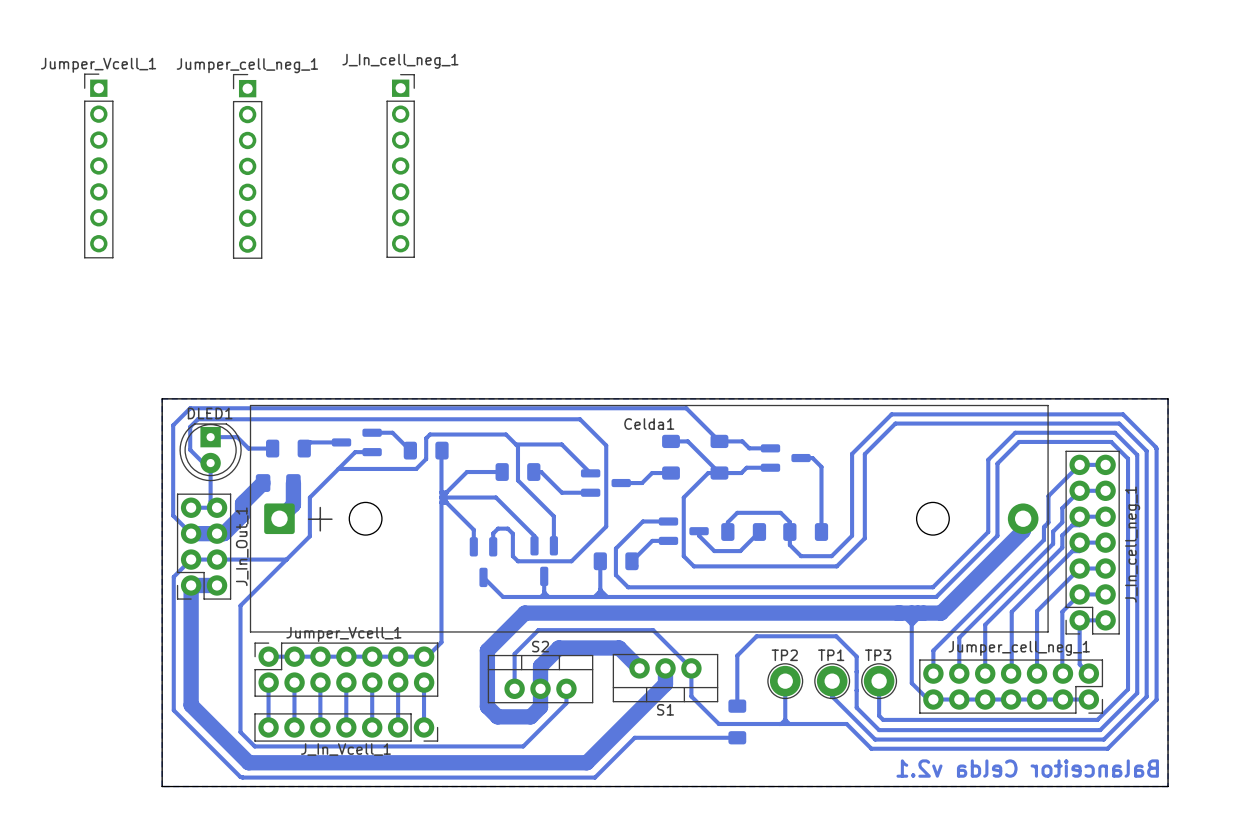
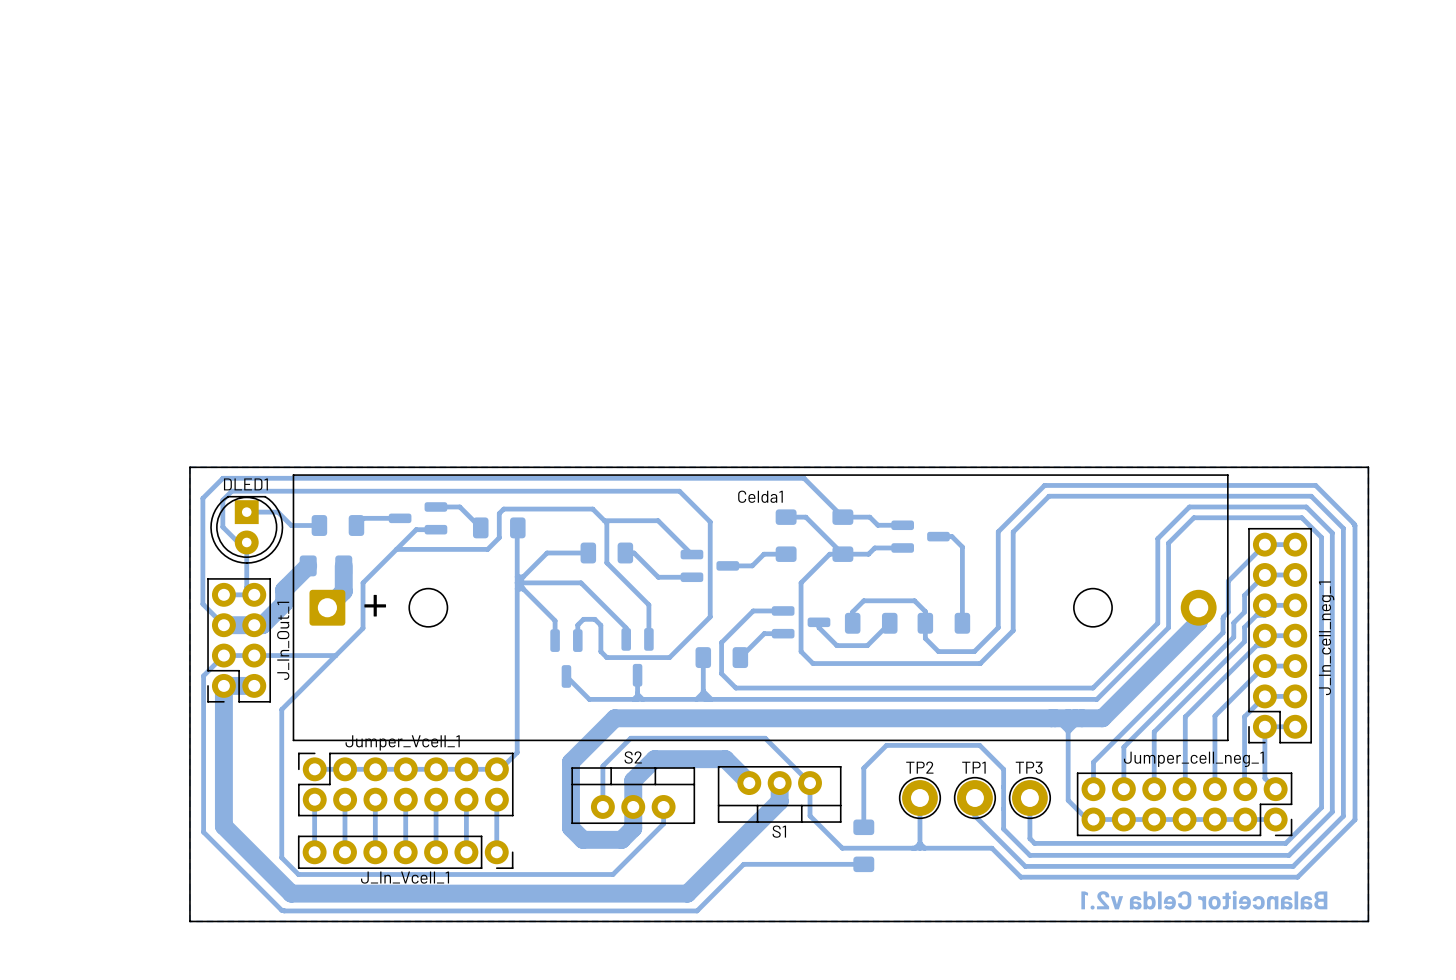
Jumper_Vcell_1: (98, 165) -> none
J_In_cell_neg_1: (400, 165) -> none
Jumper_cell_neg_1: (247, 166) -> none

